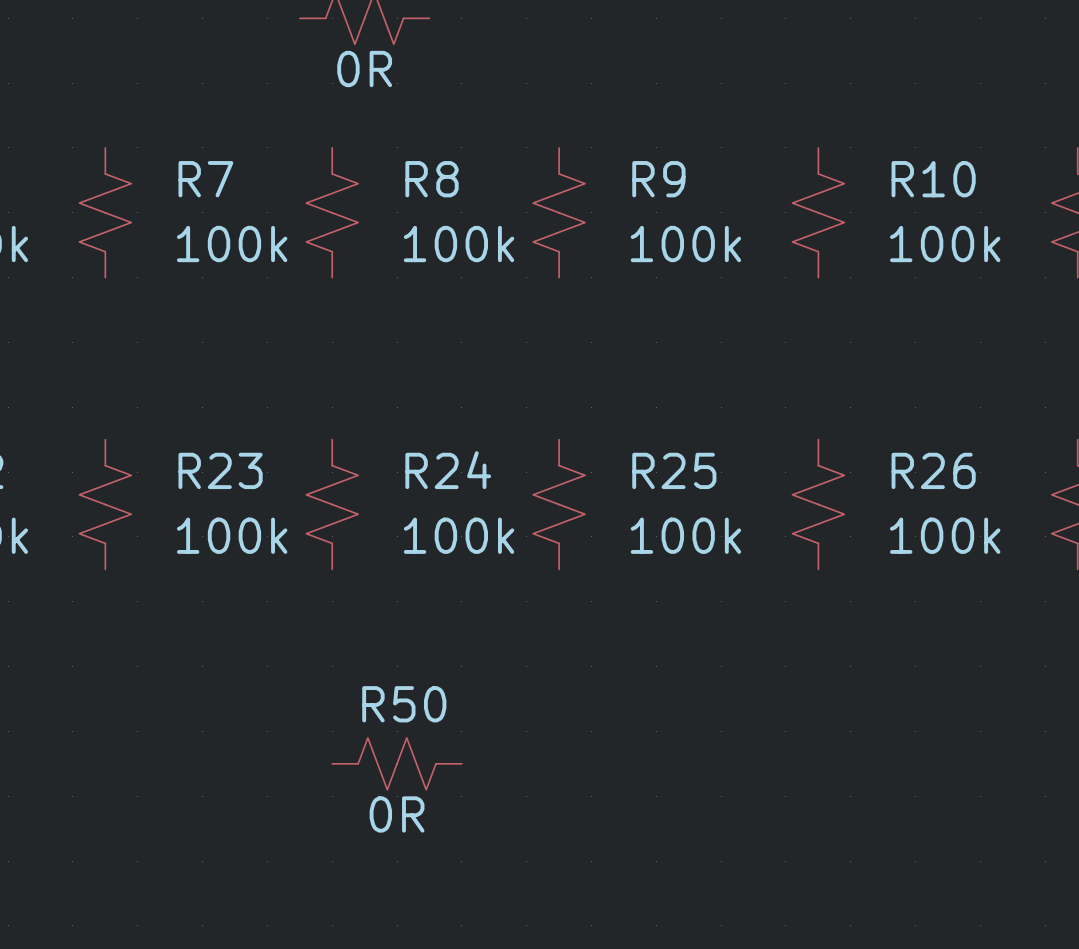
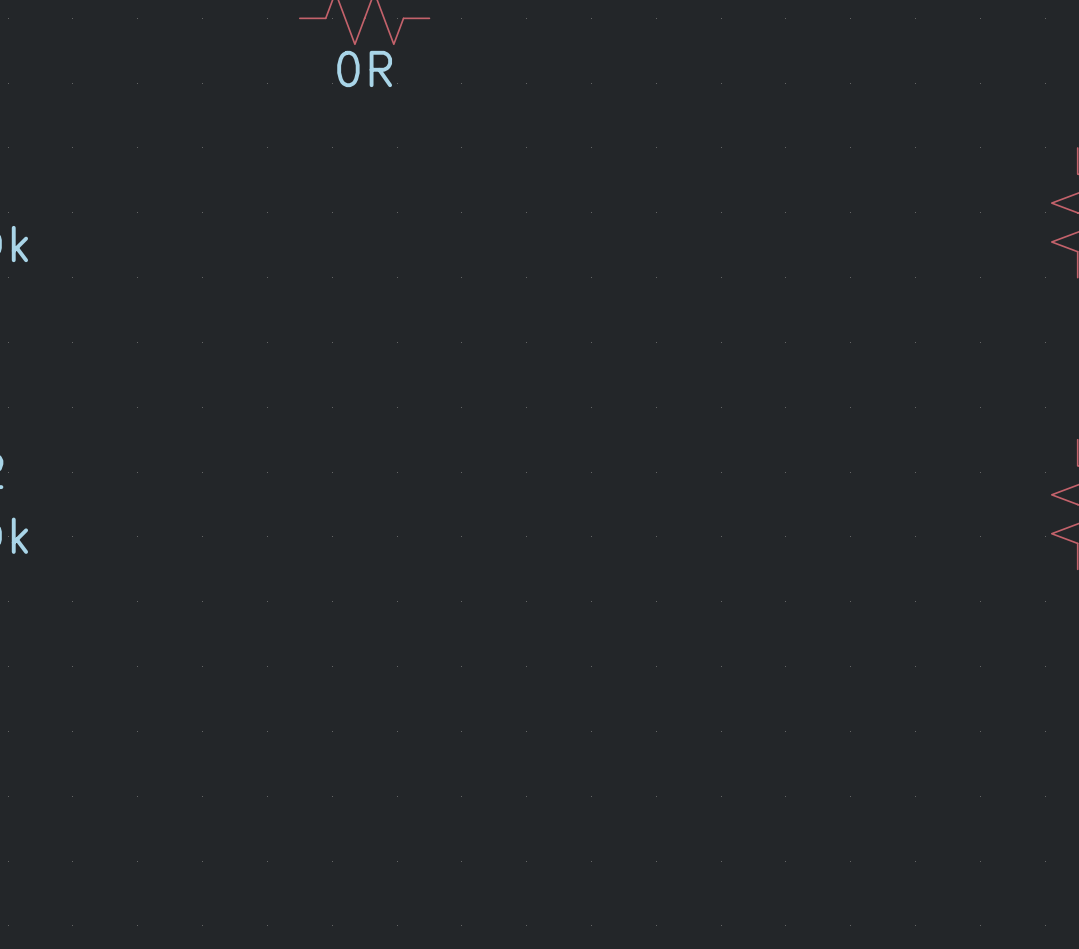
R7: 100k (105, 212) -> none
R8: 100k (332, 212) -> none
R9: 100k (559, 212) -> none
R10: 100k (818, 212) -> none
R23: 100k (105, 504) -> none
R24: 100k (332, 504) -> none
R25: 100k (559, 504) -> none
R26: 100k (818, 504) -> none
R50: 0R (397, 763) -> none

